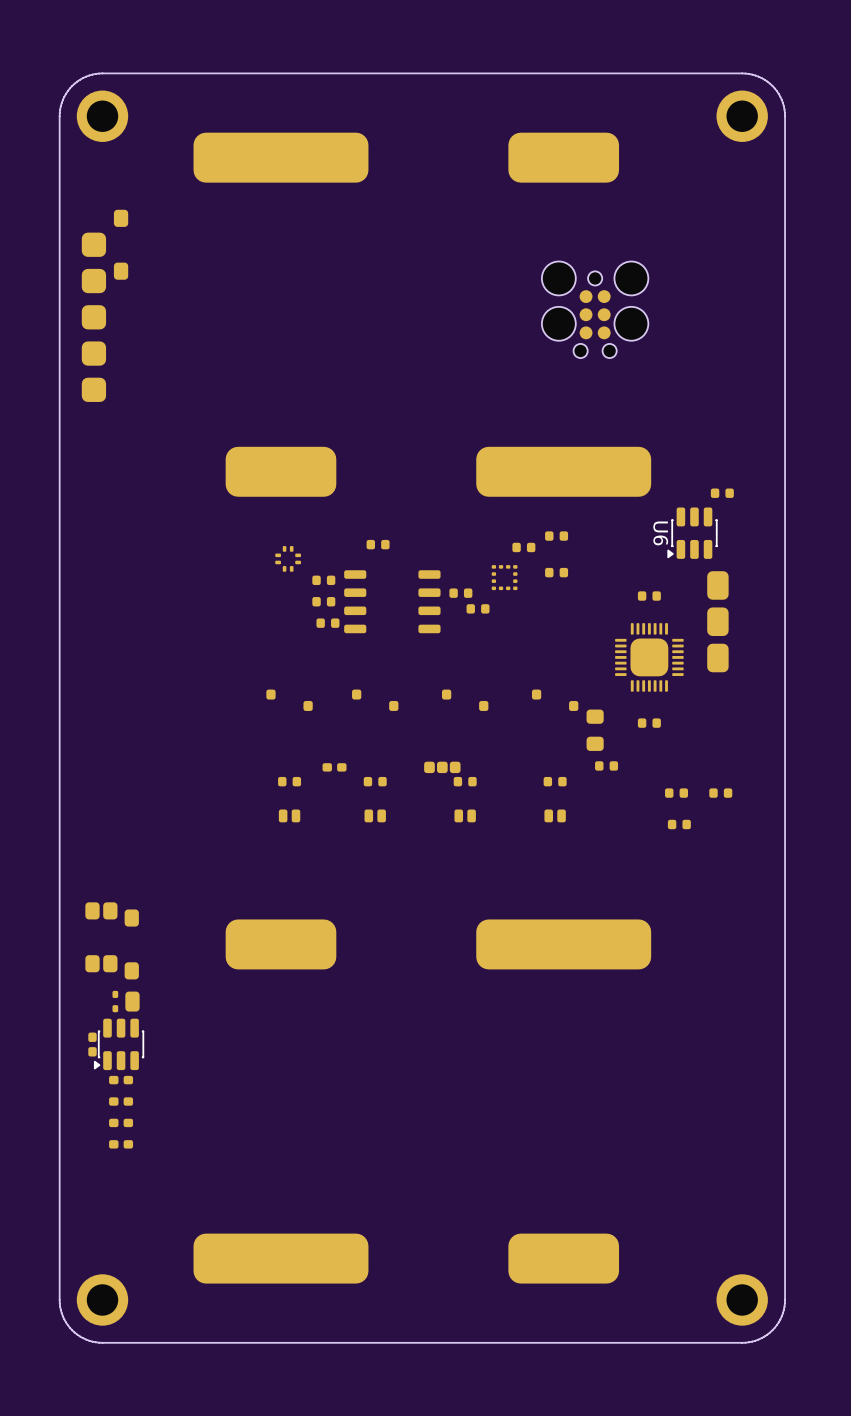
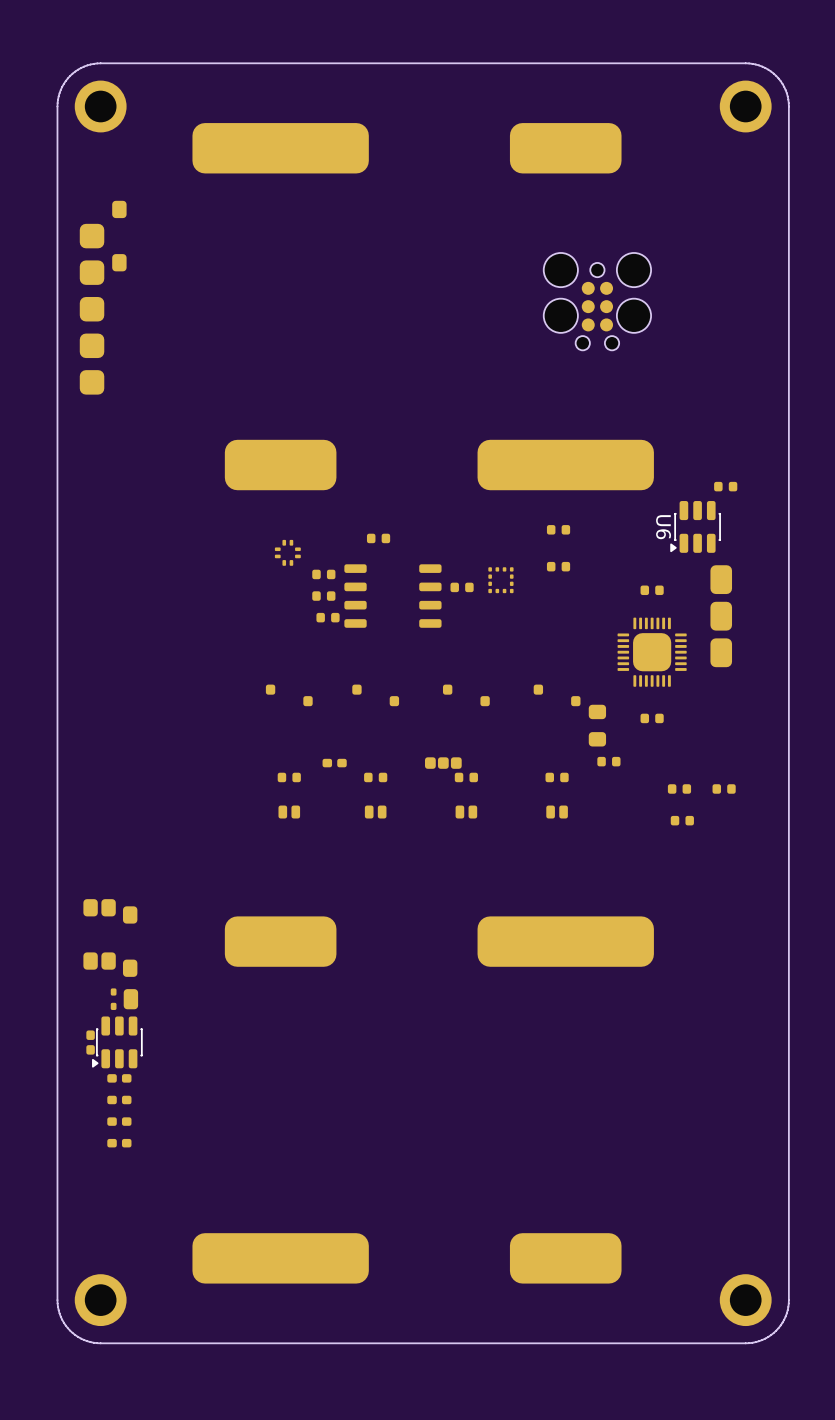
part: (523, 547) -> none
part rotation: 0° (504, 577) -> 90° clockwise (500, 580)
part: (478, 608) -> none

